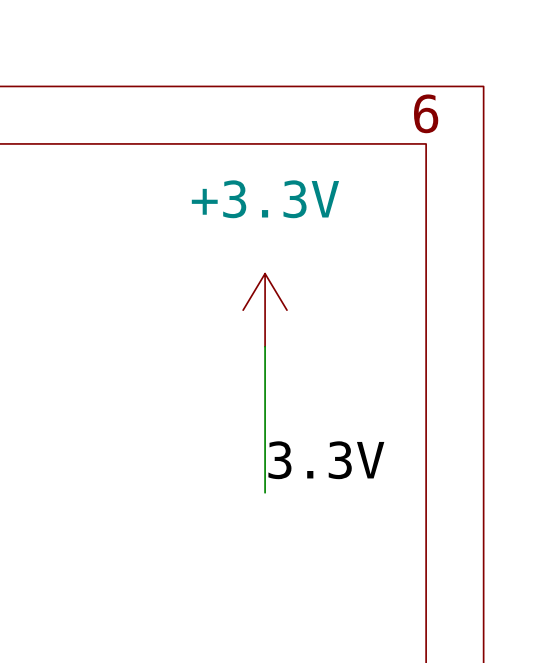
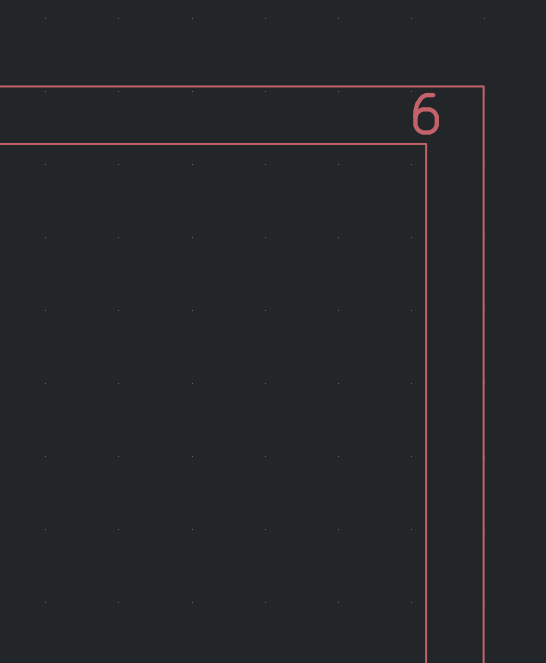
power symbol: +3.3V (265, 310) -> none
wire: (265, 346) (265, 492) -> none
label: 3.3V (326, 460) -> none

